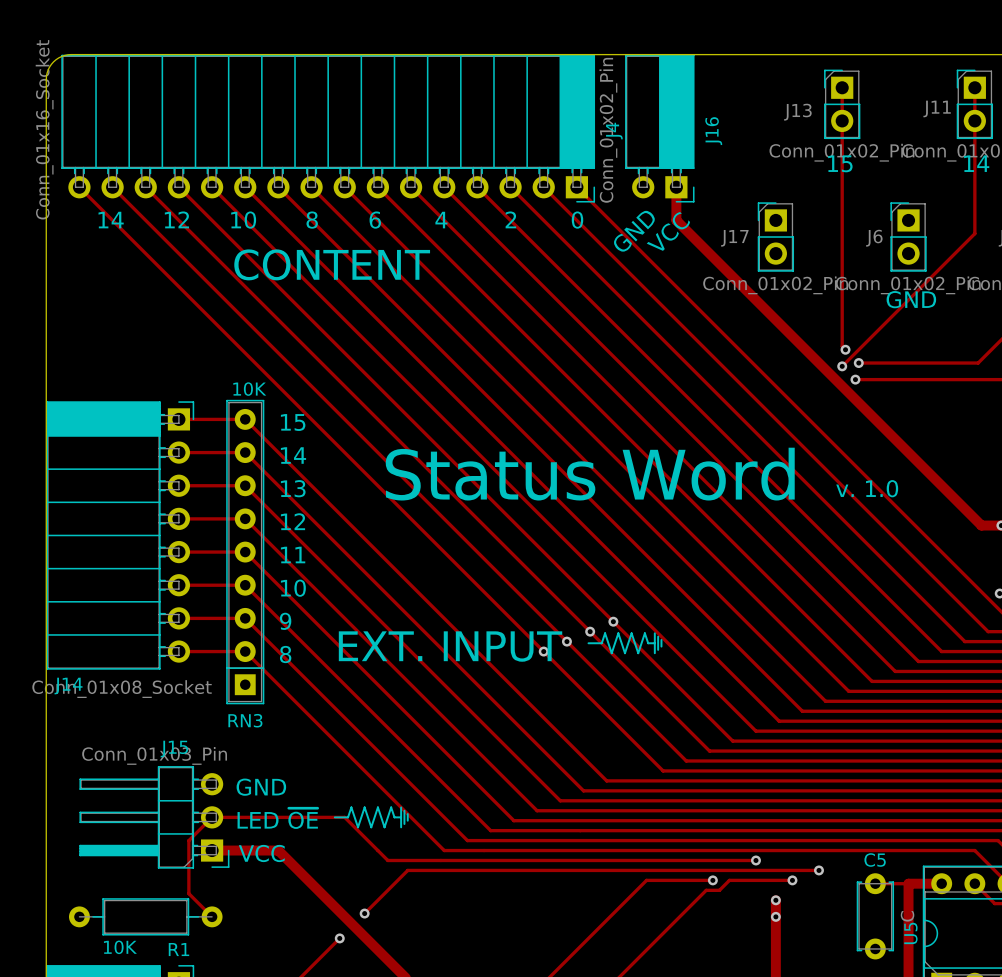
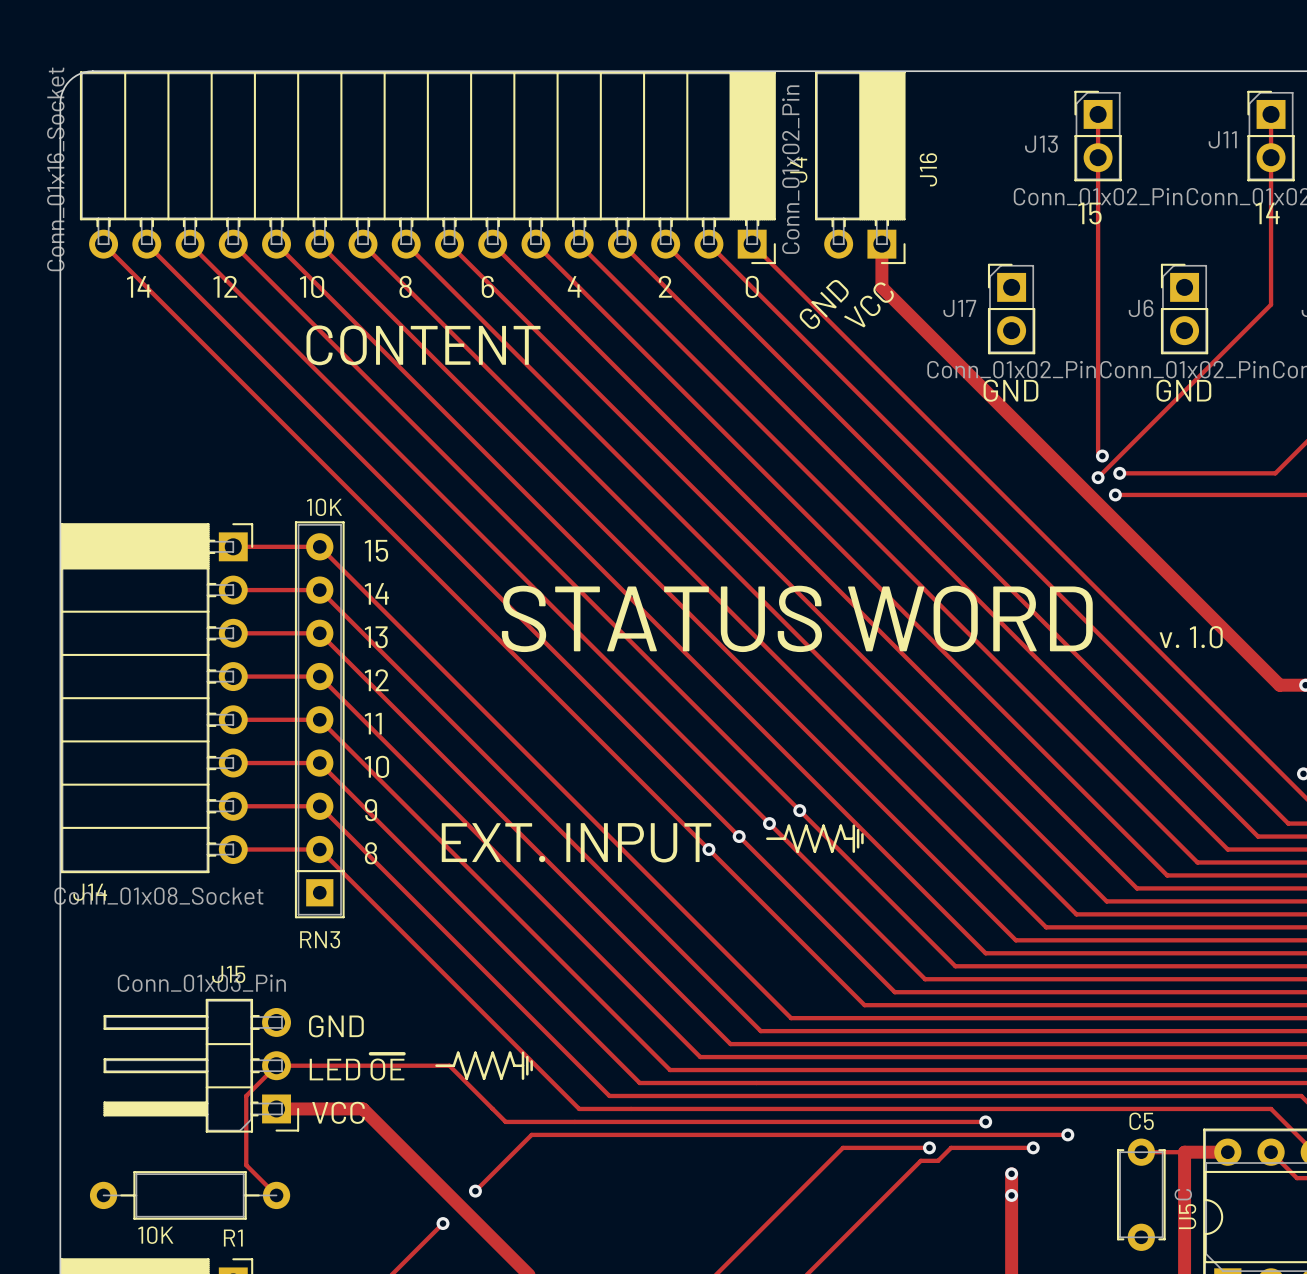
text: none -> GND (1010, 390)
text: Status Word (590, 474) -> STATUS WORD (797, 618)
text position: v. 1.0 (867, 488) -> v. 1.0 (1191, 637)

